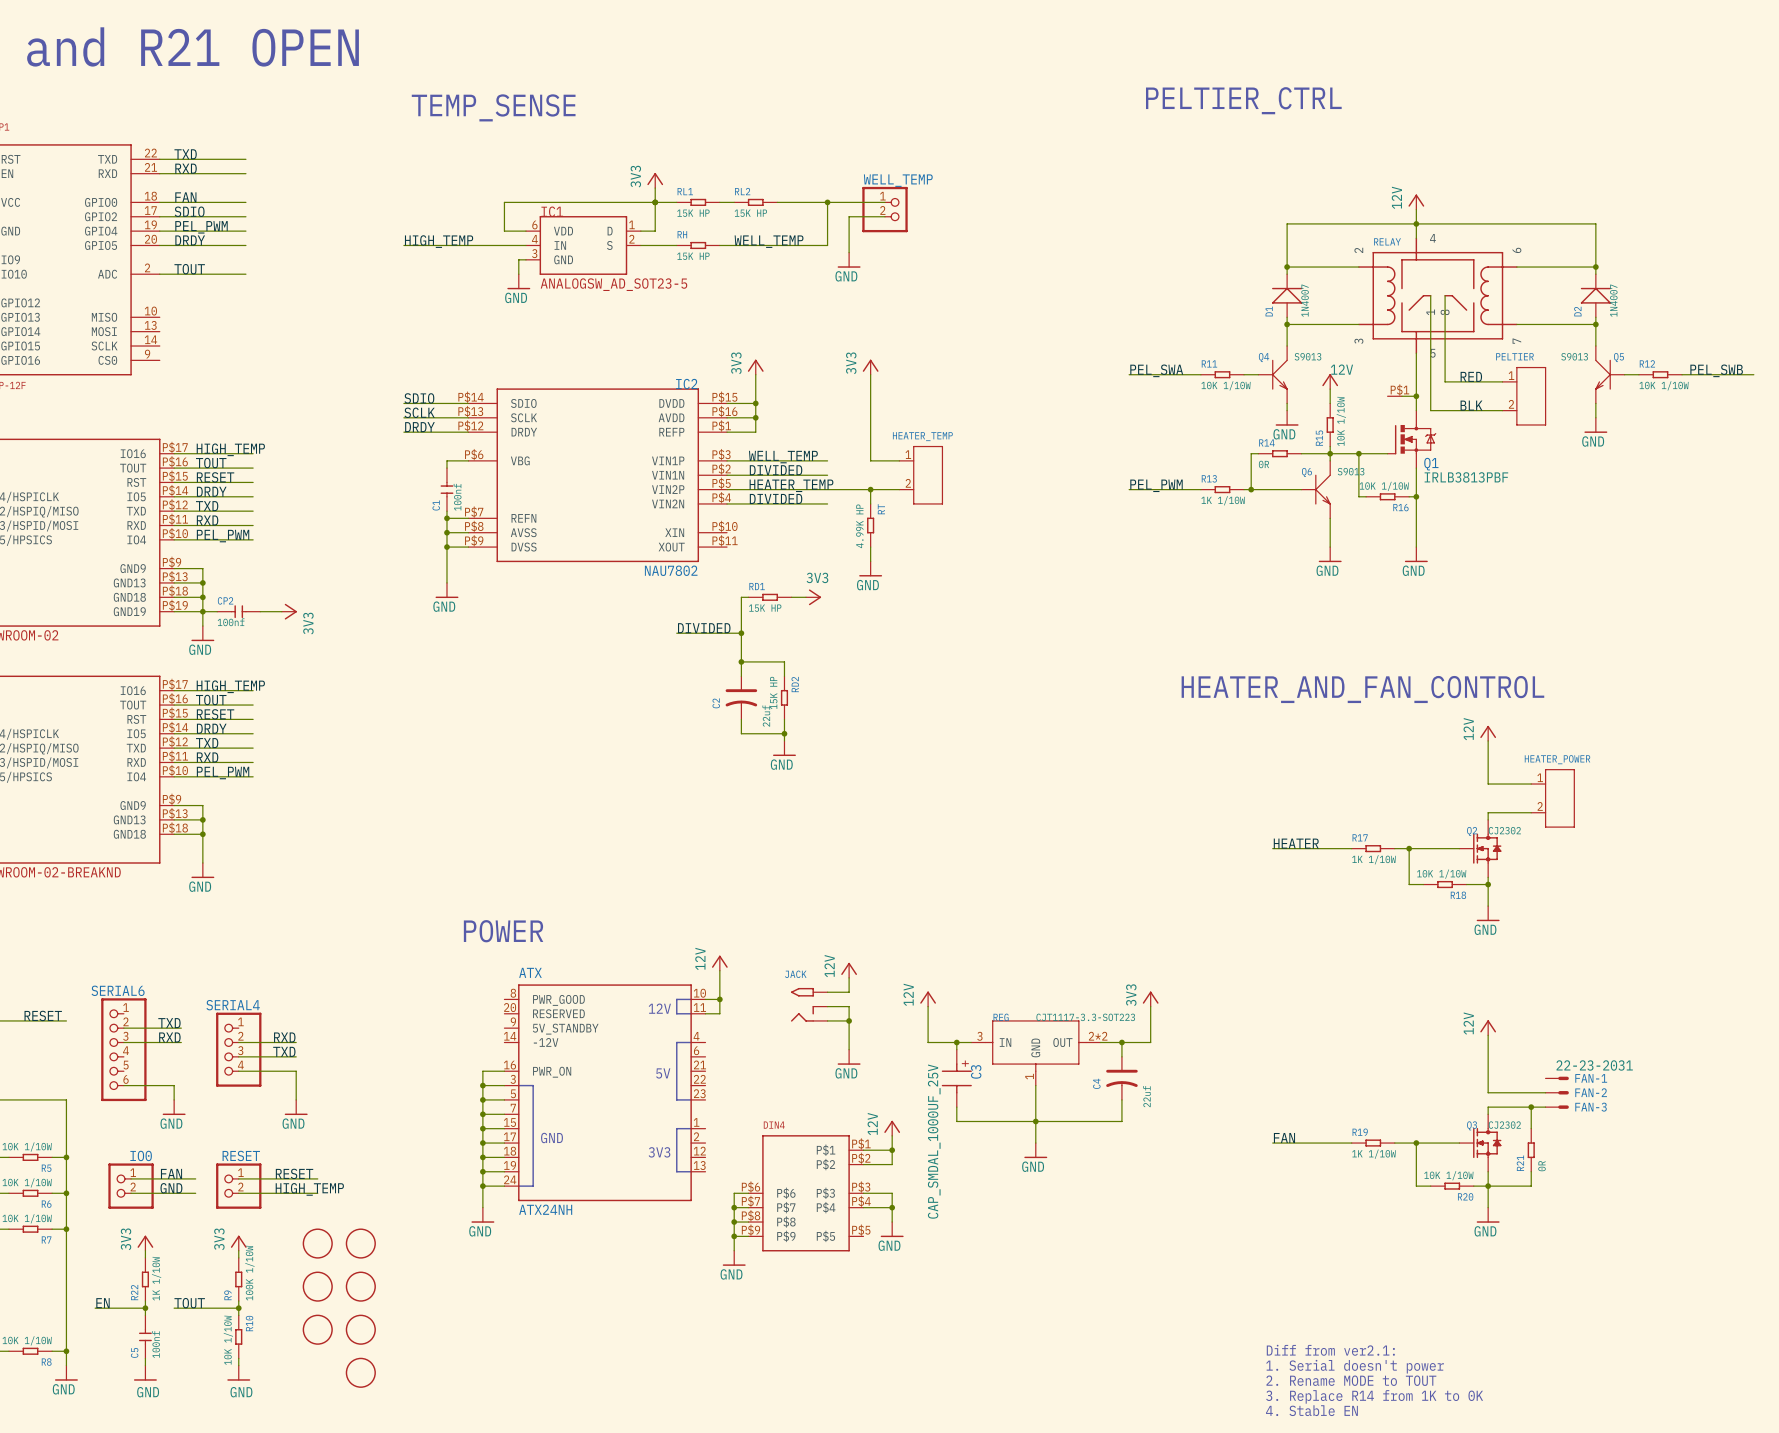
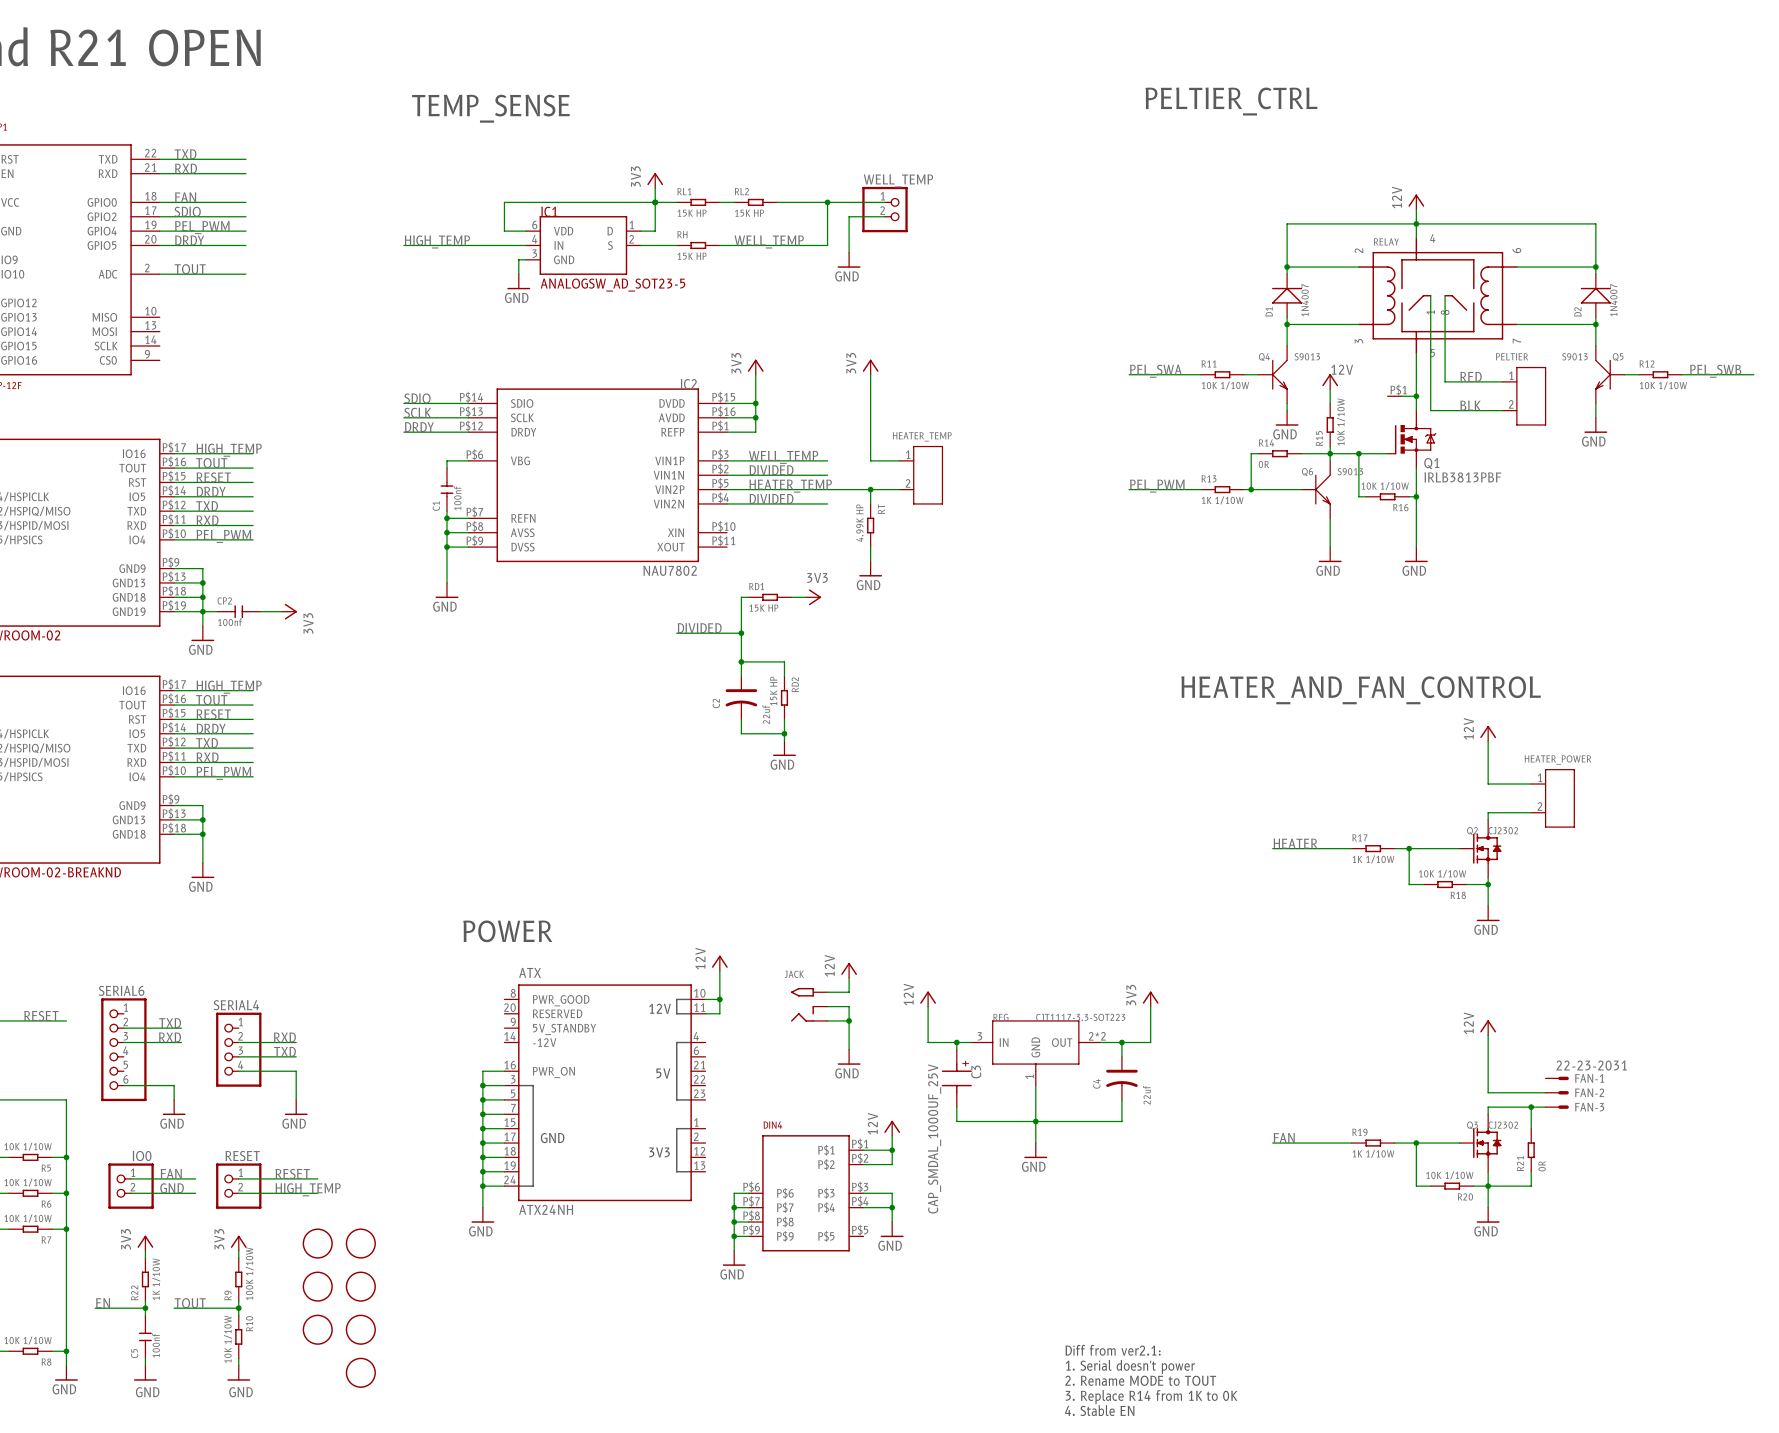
text: none -> Diff from ver2.1: (1113, 1350)
text: Diff from ver2.1: (1330, 1350) -> none
text: none -> 1. Serial doesn't power (1130, 1366)
text: 1. Serial doesn't power (1355, 1366) -> none
text: none -> 2. Rename MODE to TOUT (1140, 1380)
text: 2. Rename MODE to TOUT (1351, 1380) -> none
text: none -> 3. Replace R14 from 1K to 0K (1151, 1397)
text: 3. Replace R14 from 1K to 0K (1374, 1396) -> none
text: none -> 4. Stable EN (1099, 1410)
text: 4. Stable EN (1311, 1410) -> none

